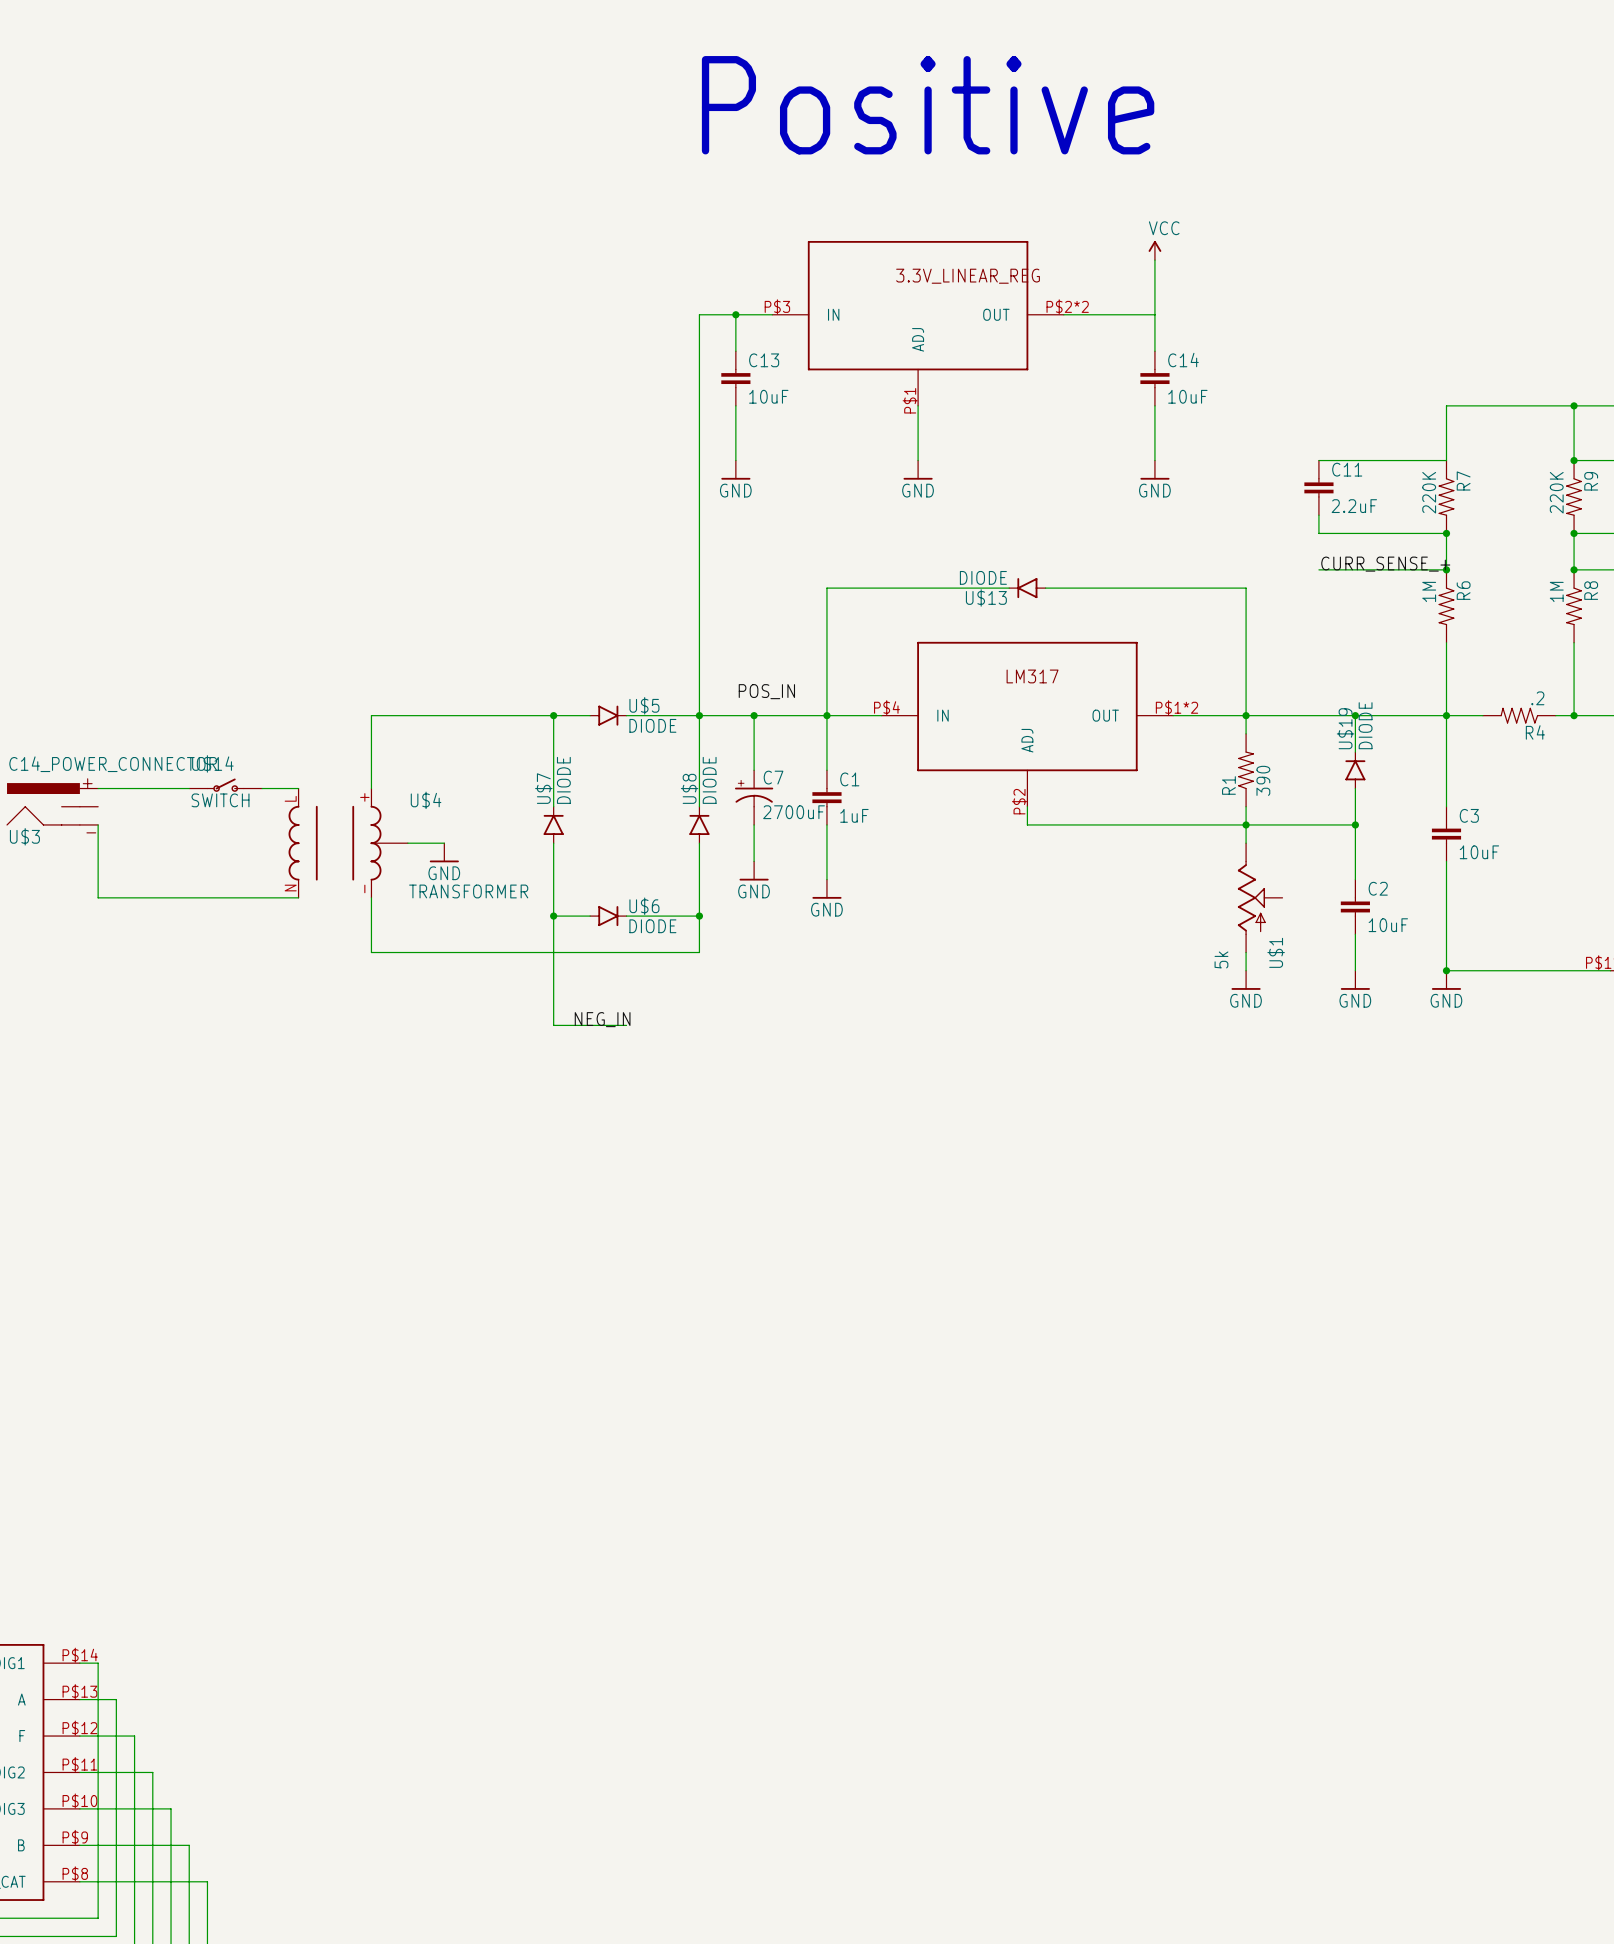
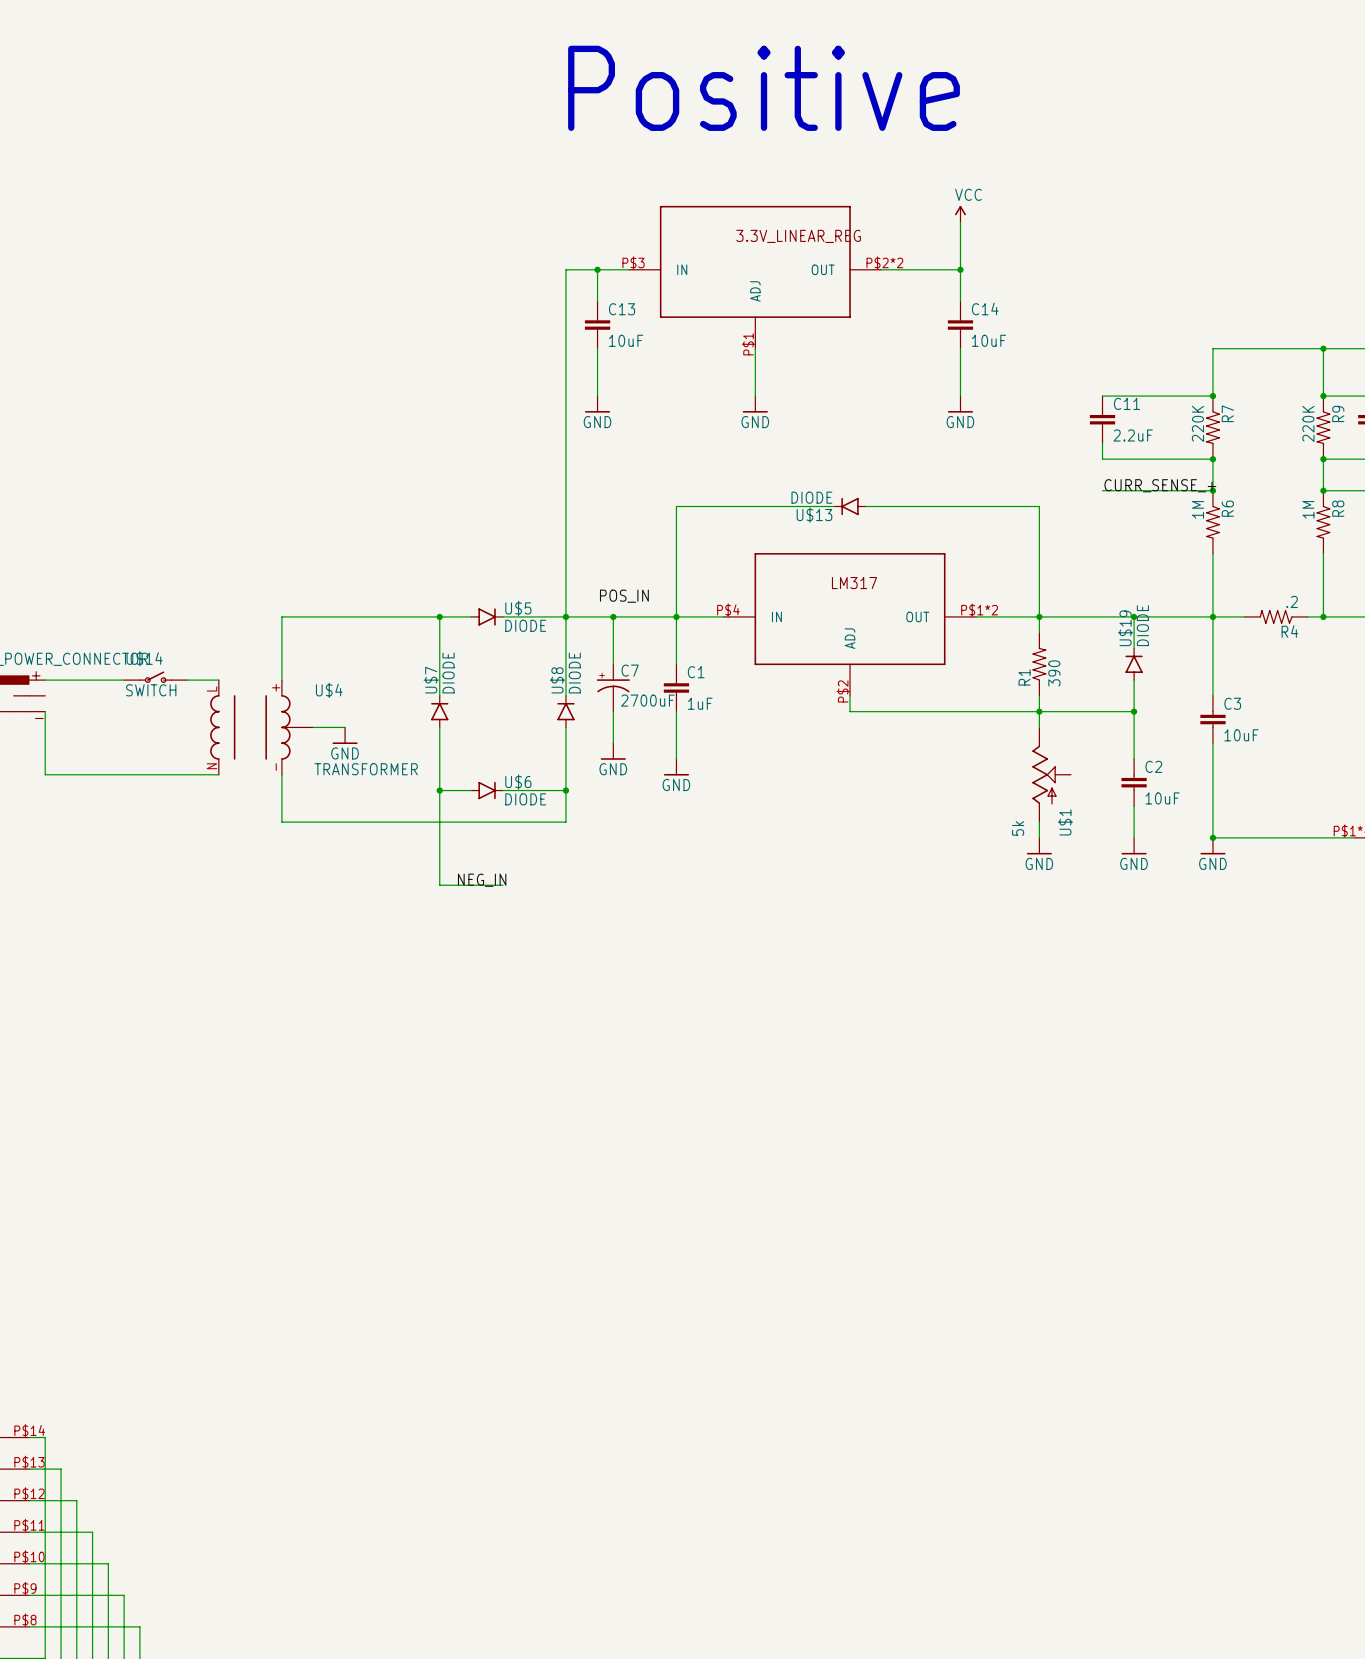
junction: none -> (960, 269)
junction: none -> (1212, 396)

